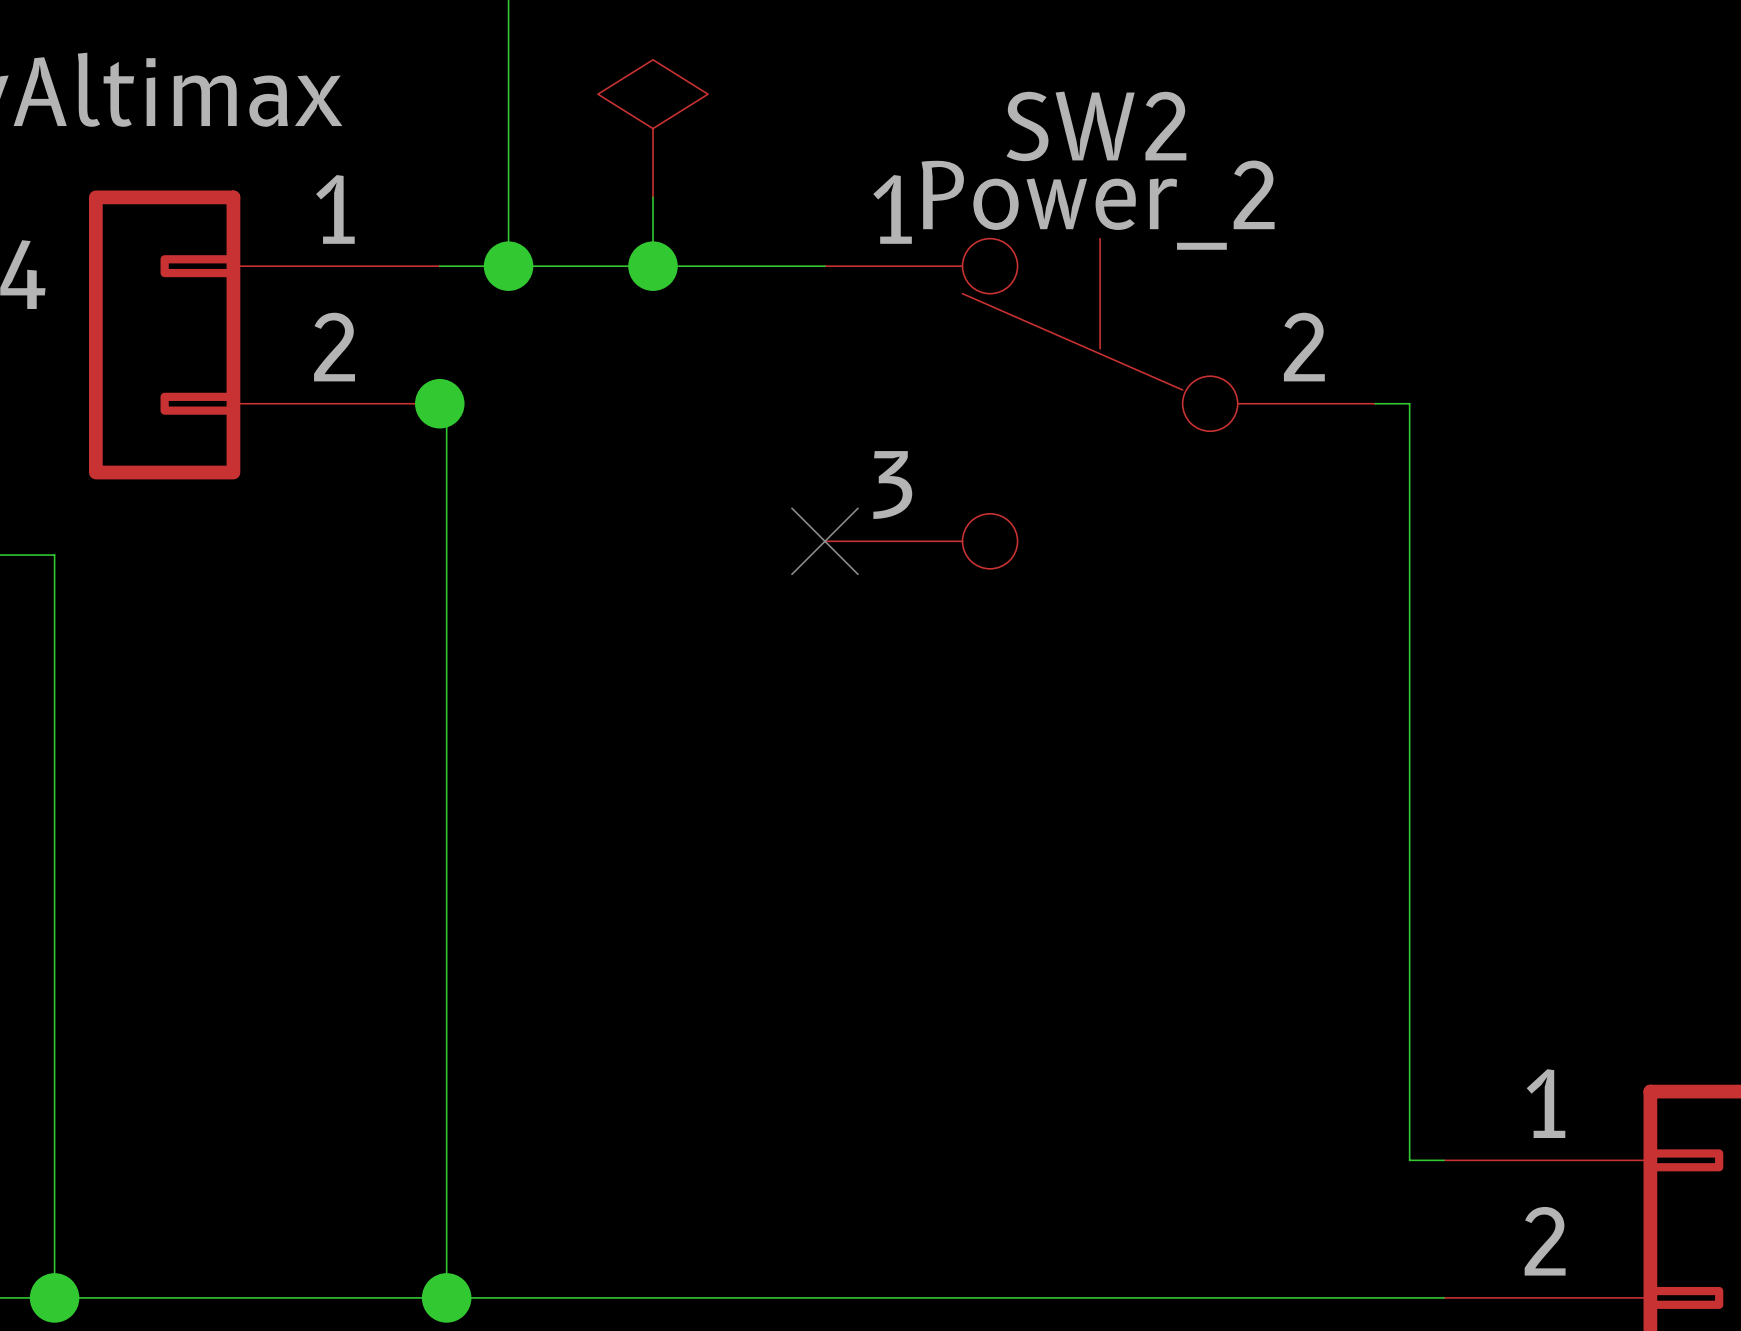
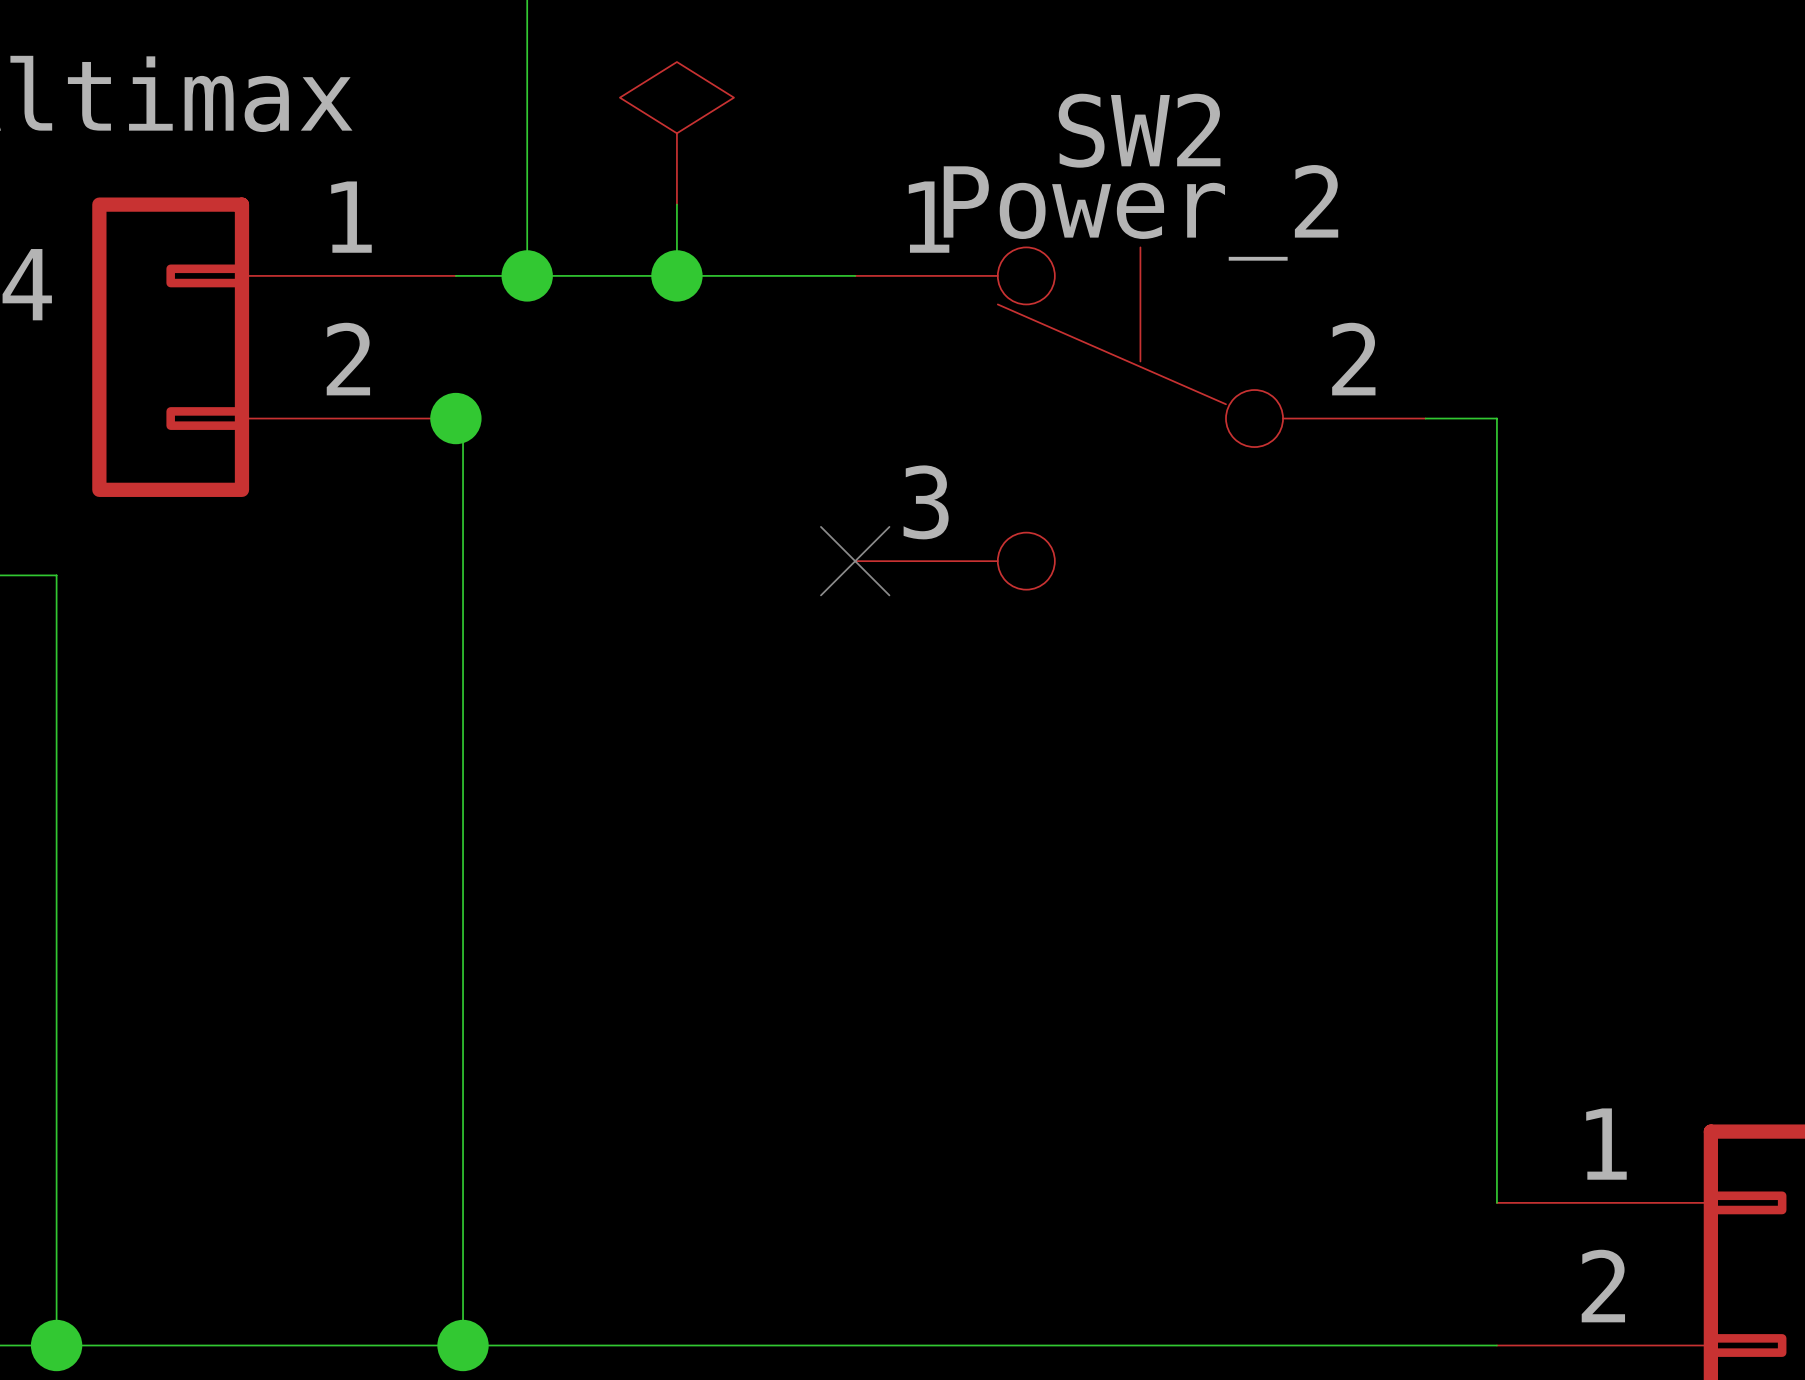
wire: (1409, 403) (1409, 1160) (1444, 1160) -> (1461, 418) (1496, 418) (1496, 1202)

